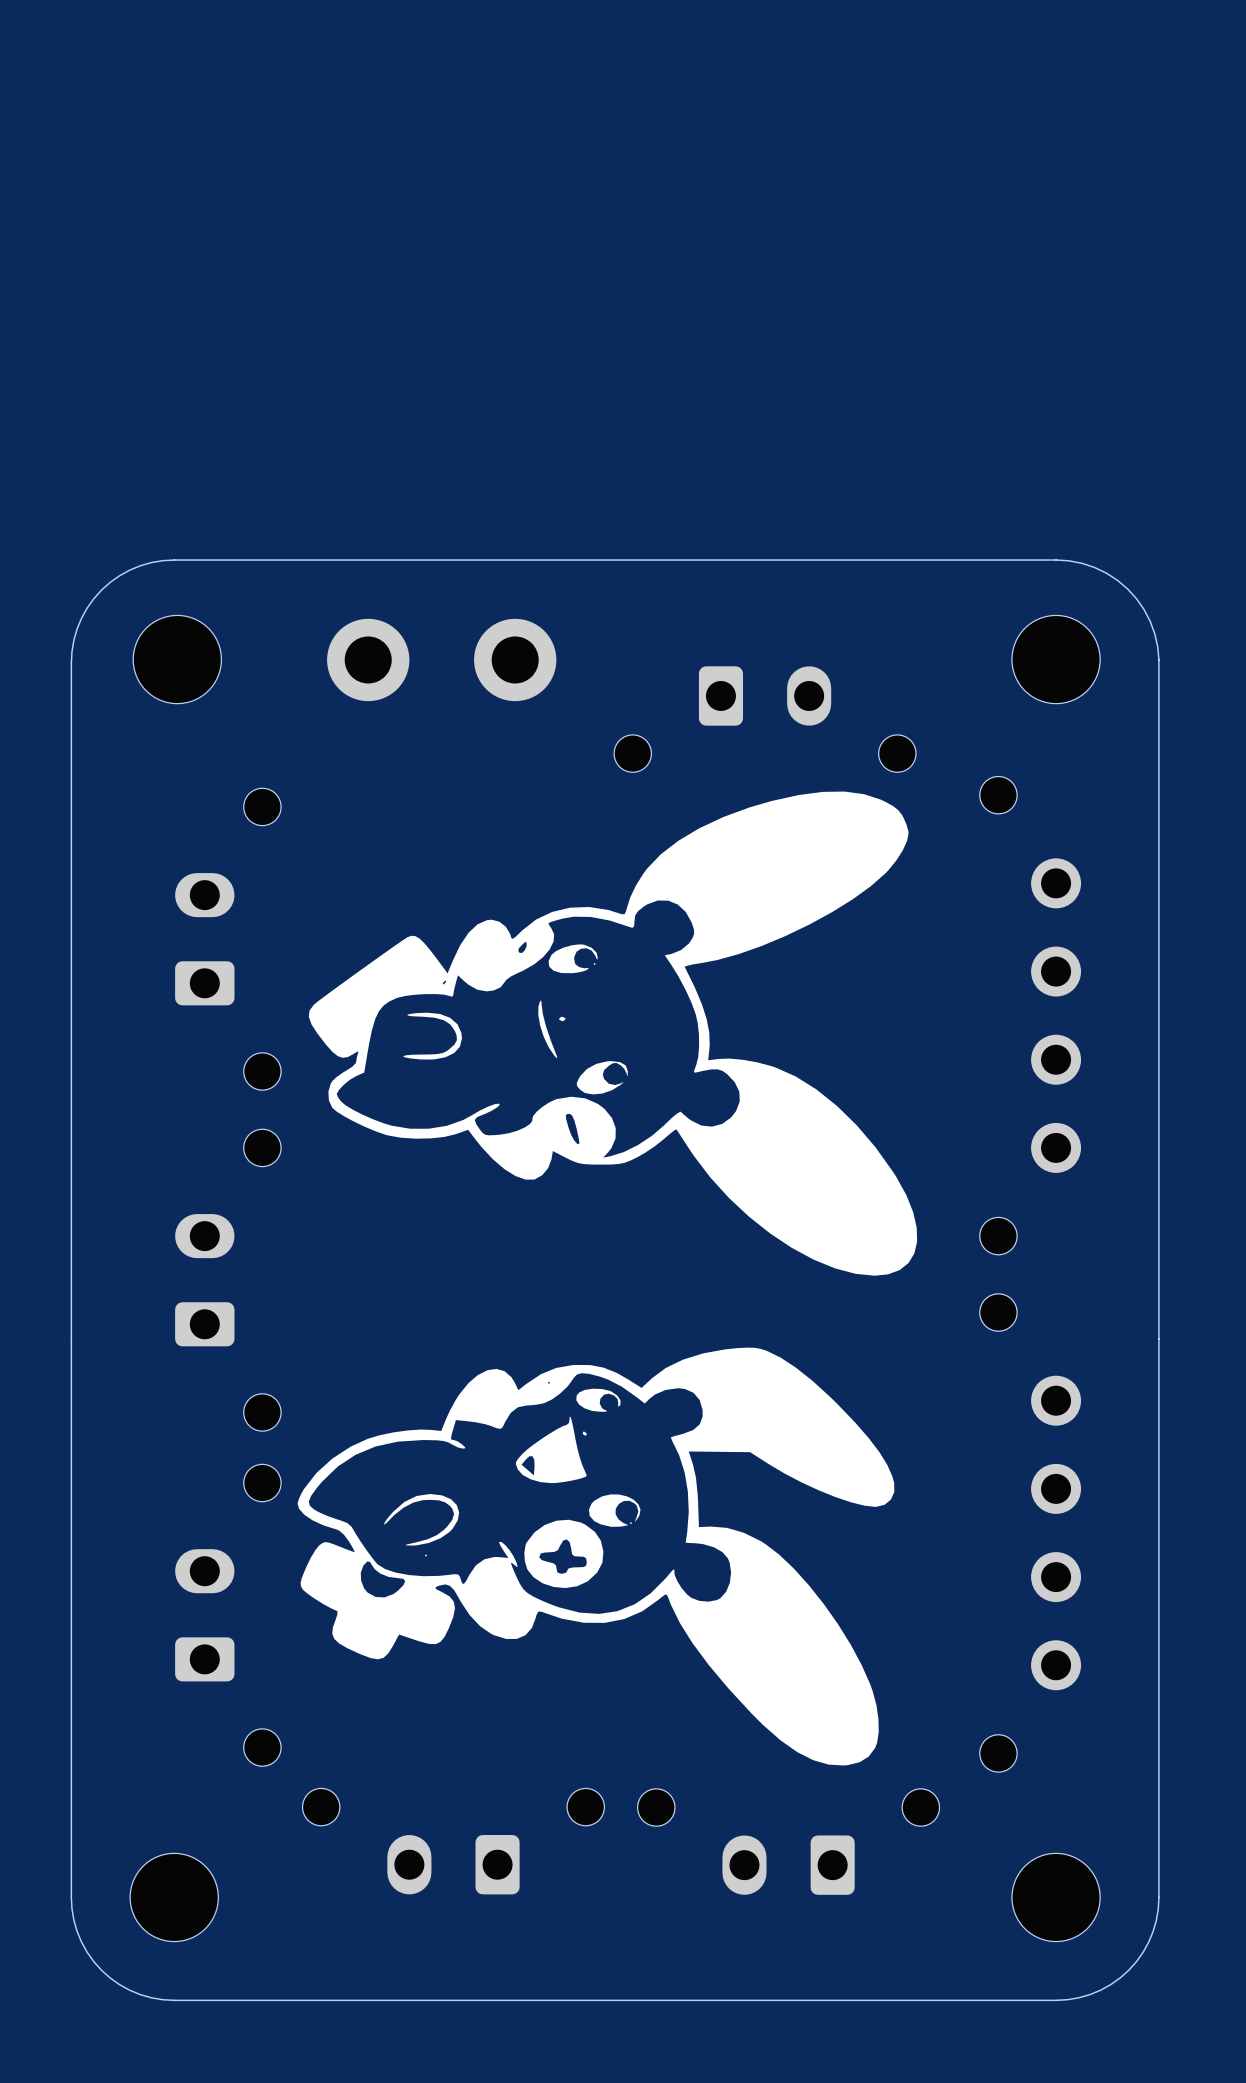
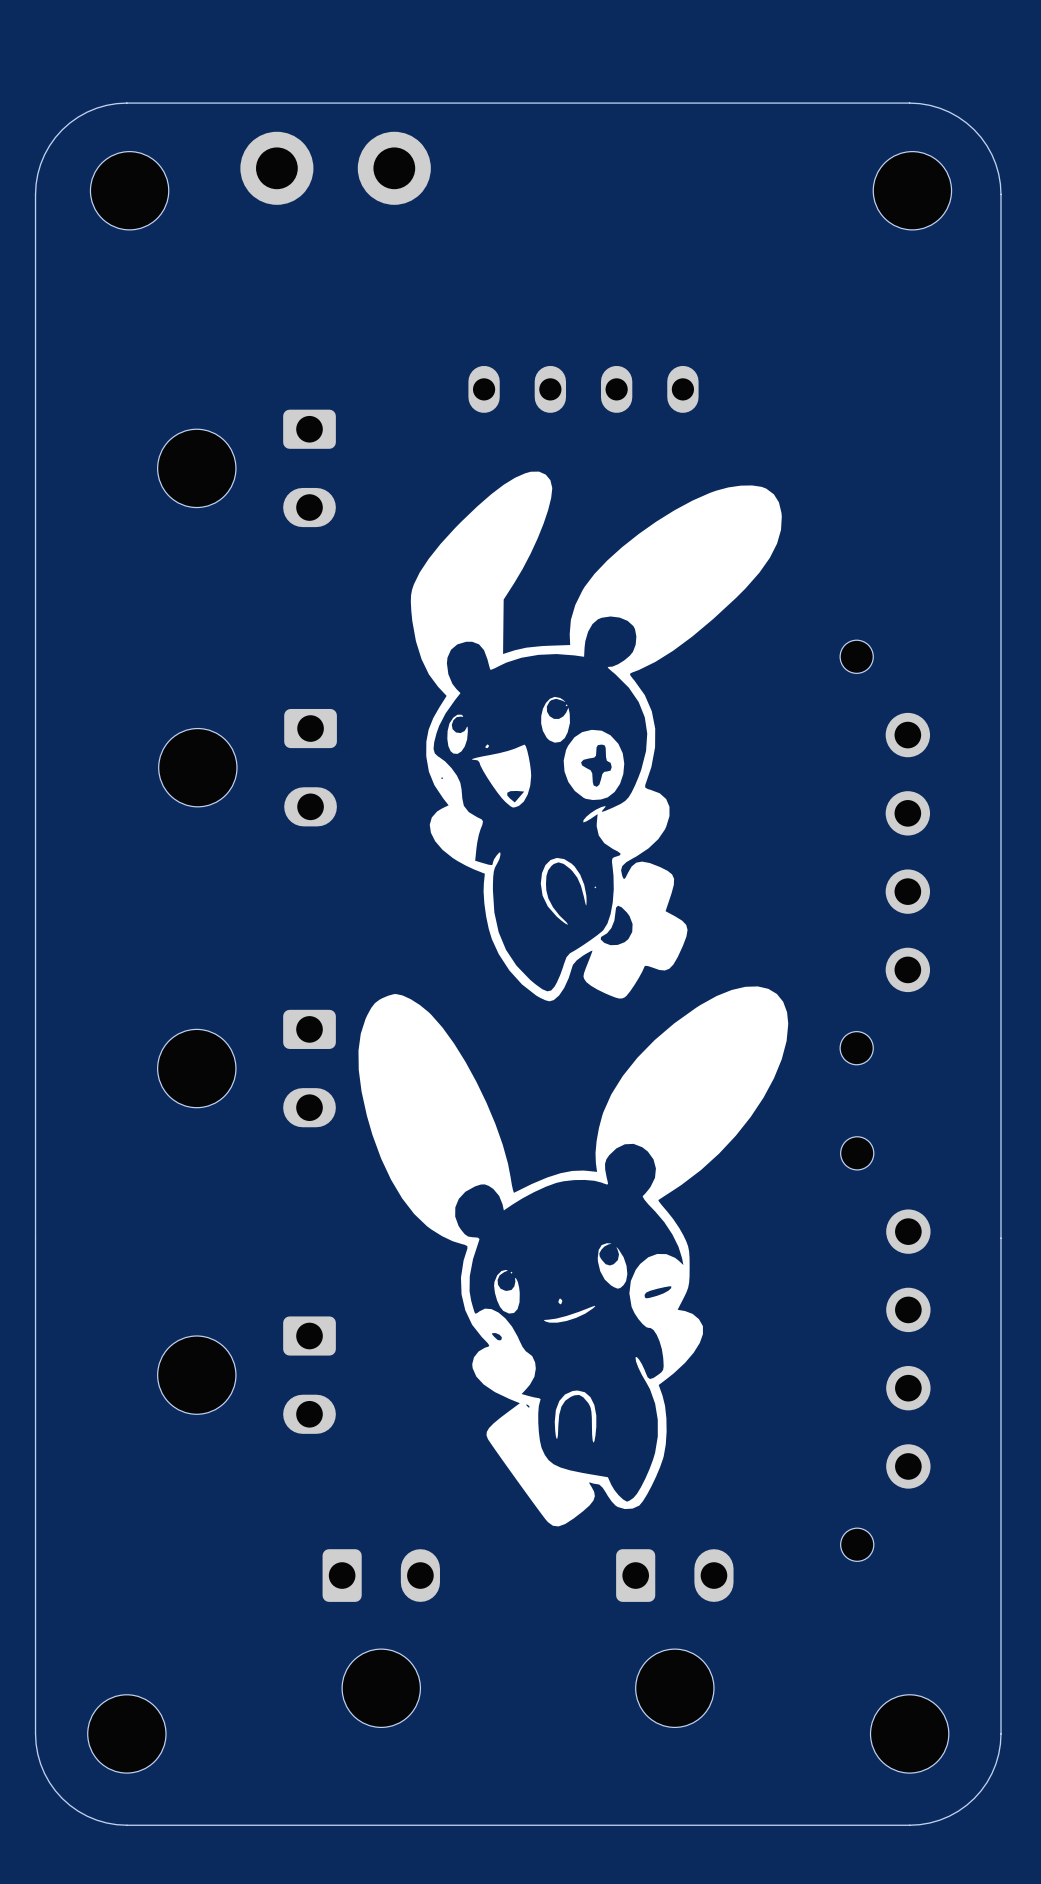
part: none -> (276, 168)
part: none -> (394, 168)
part: none -> (583, 389)
part: none -> (246, 468)
drawing: none -> [358, 471, 789, 1527]
part position: (177, 659) -> (129, 190)
part: (368, 659) -> none
part: (515, 659) -> none
part position: (1056, 659) -> (912, 190)
board edge: (1158, 659) (1157, 646) (1150, 621) (1136, 598) (1117, 580) (1106, 573) (1094, 567) (1069, 560) (174, 560) (140, 565) (119, 575) (101, 590) (87, 608) (77, 628) (71, 662) -> (1000, 635) (1000, 184) (995, 164) (987, 145) (974, 129) (958, 117) (939, 108) (909, 103) (126, 103) (96, 108) (69, 123) (49, 145) (37, 174) (35, 194) (35, 637)
part: (765, 719) -> none
drawing: [308, 791, 918, 1276] -> none
part: none -> (247, 767)
part: (228, 939) -> none
part position: (1030, 1015) -> (885, 852)
part: none -> (246, 1068)
part: (228, 1280) -> none
drawing: [297, 1347, 895, 1766] -> none
part: none -> (246, 1375)
part position: (1030, 1532) -> (885, 1349)
part: (228, 1615) -> none
part: none -> (381, 1638)
part: none -> (674, 1638)
part: (453, 1841) -> none
part: (788, 1841) -> none

